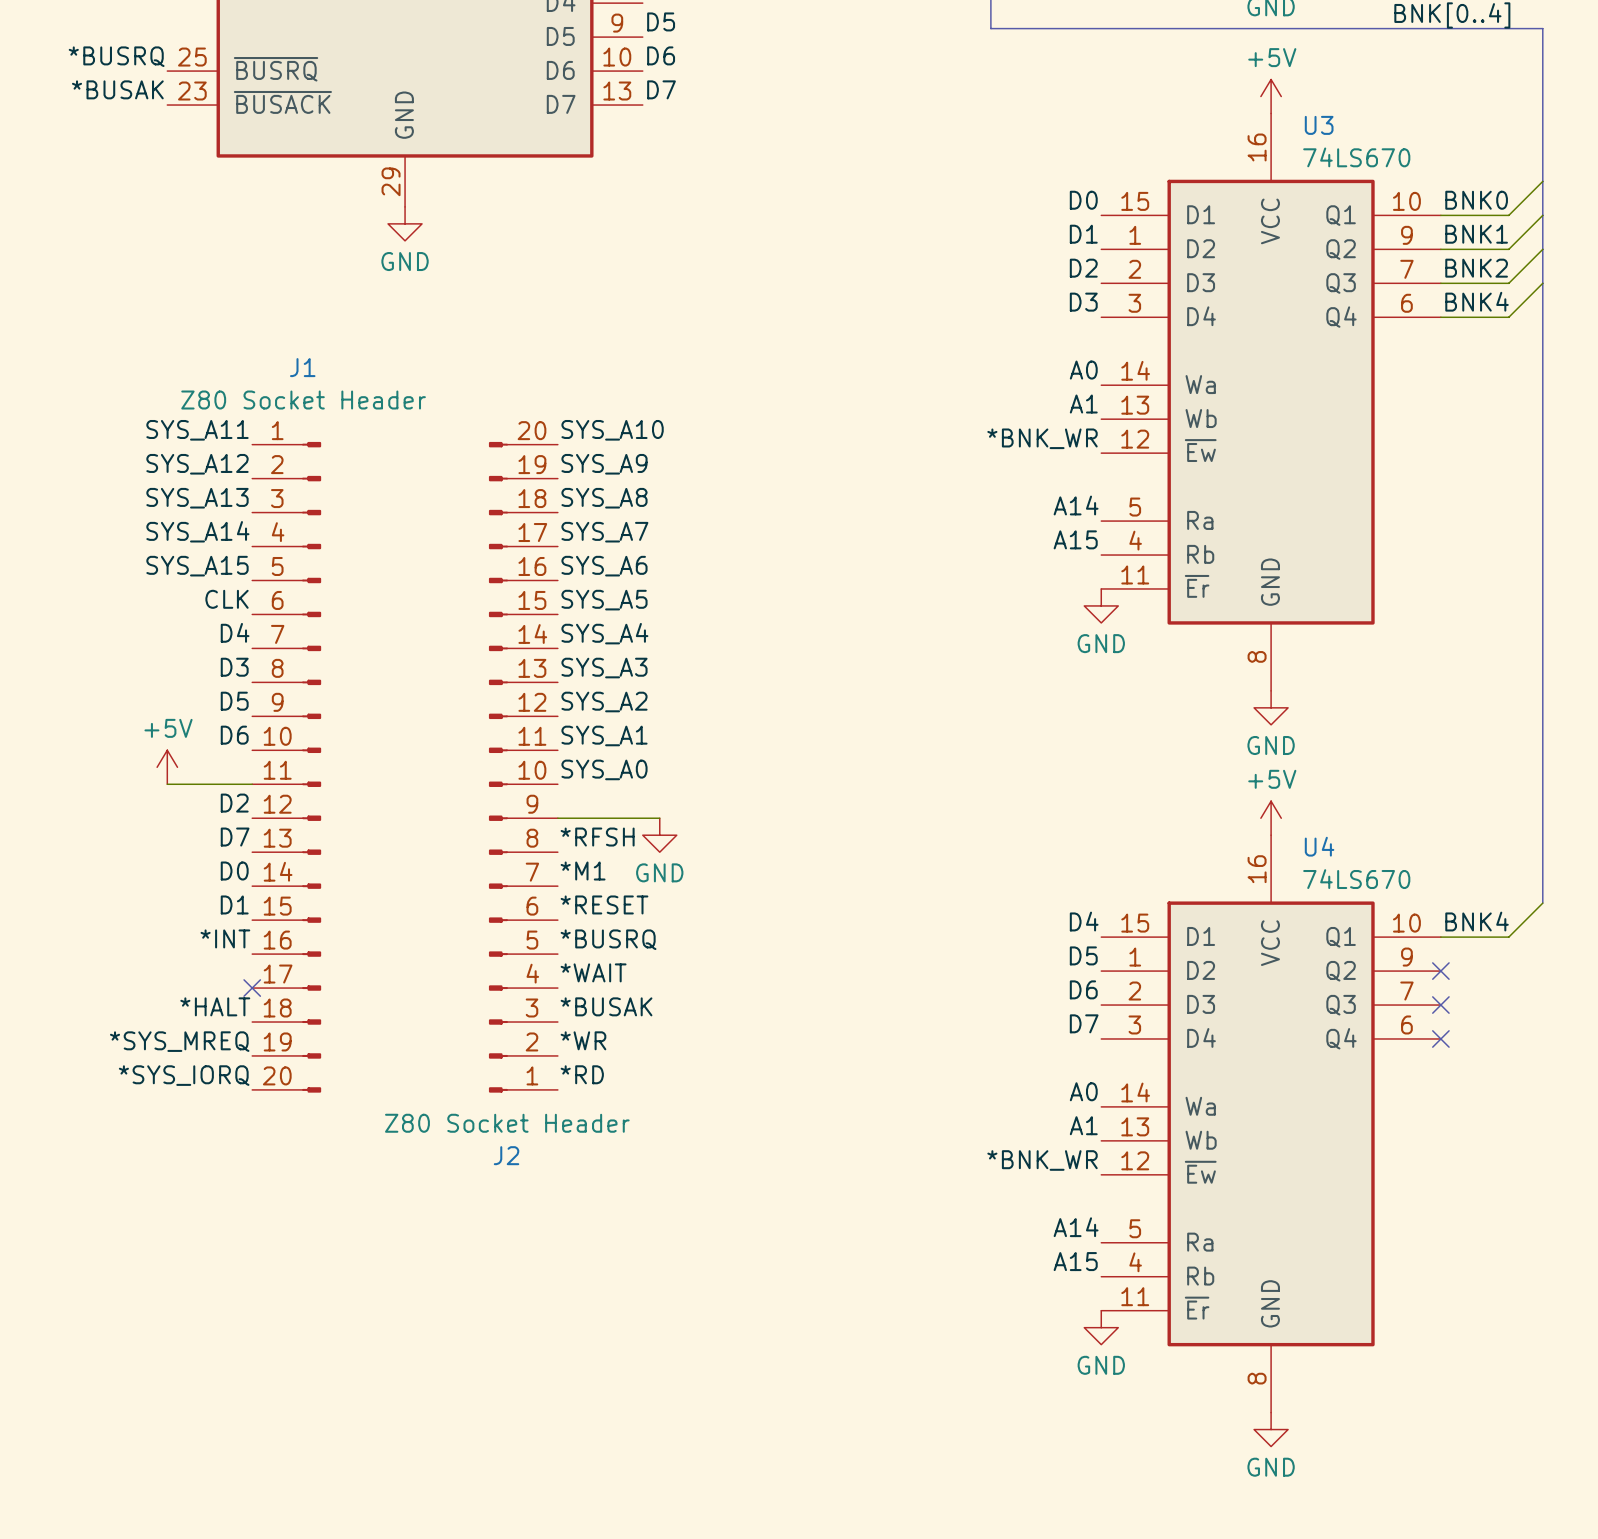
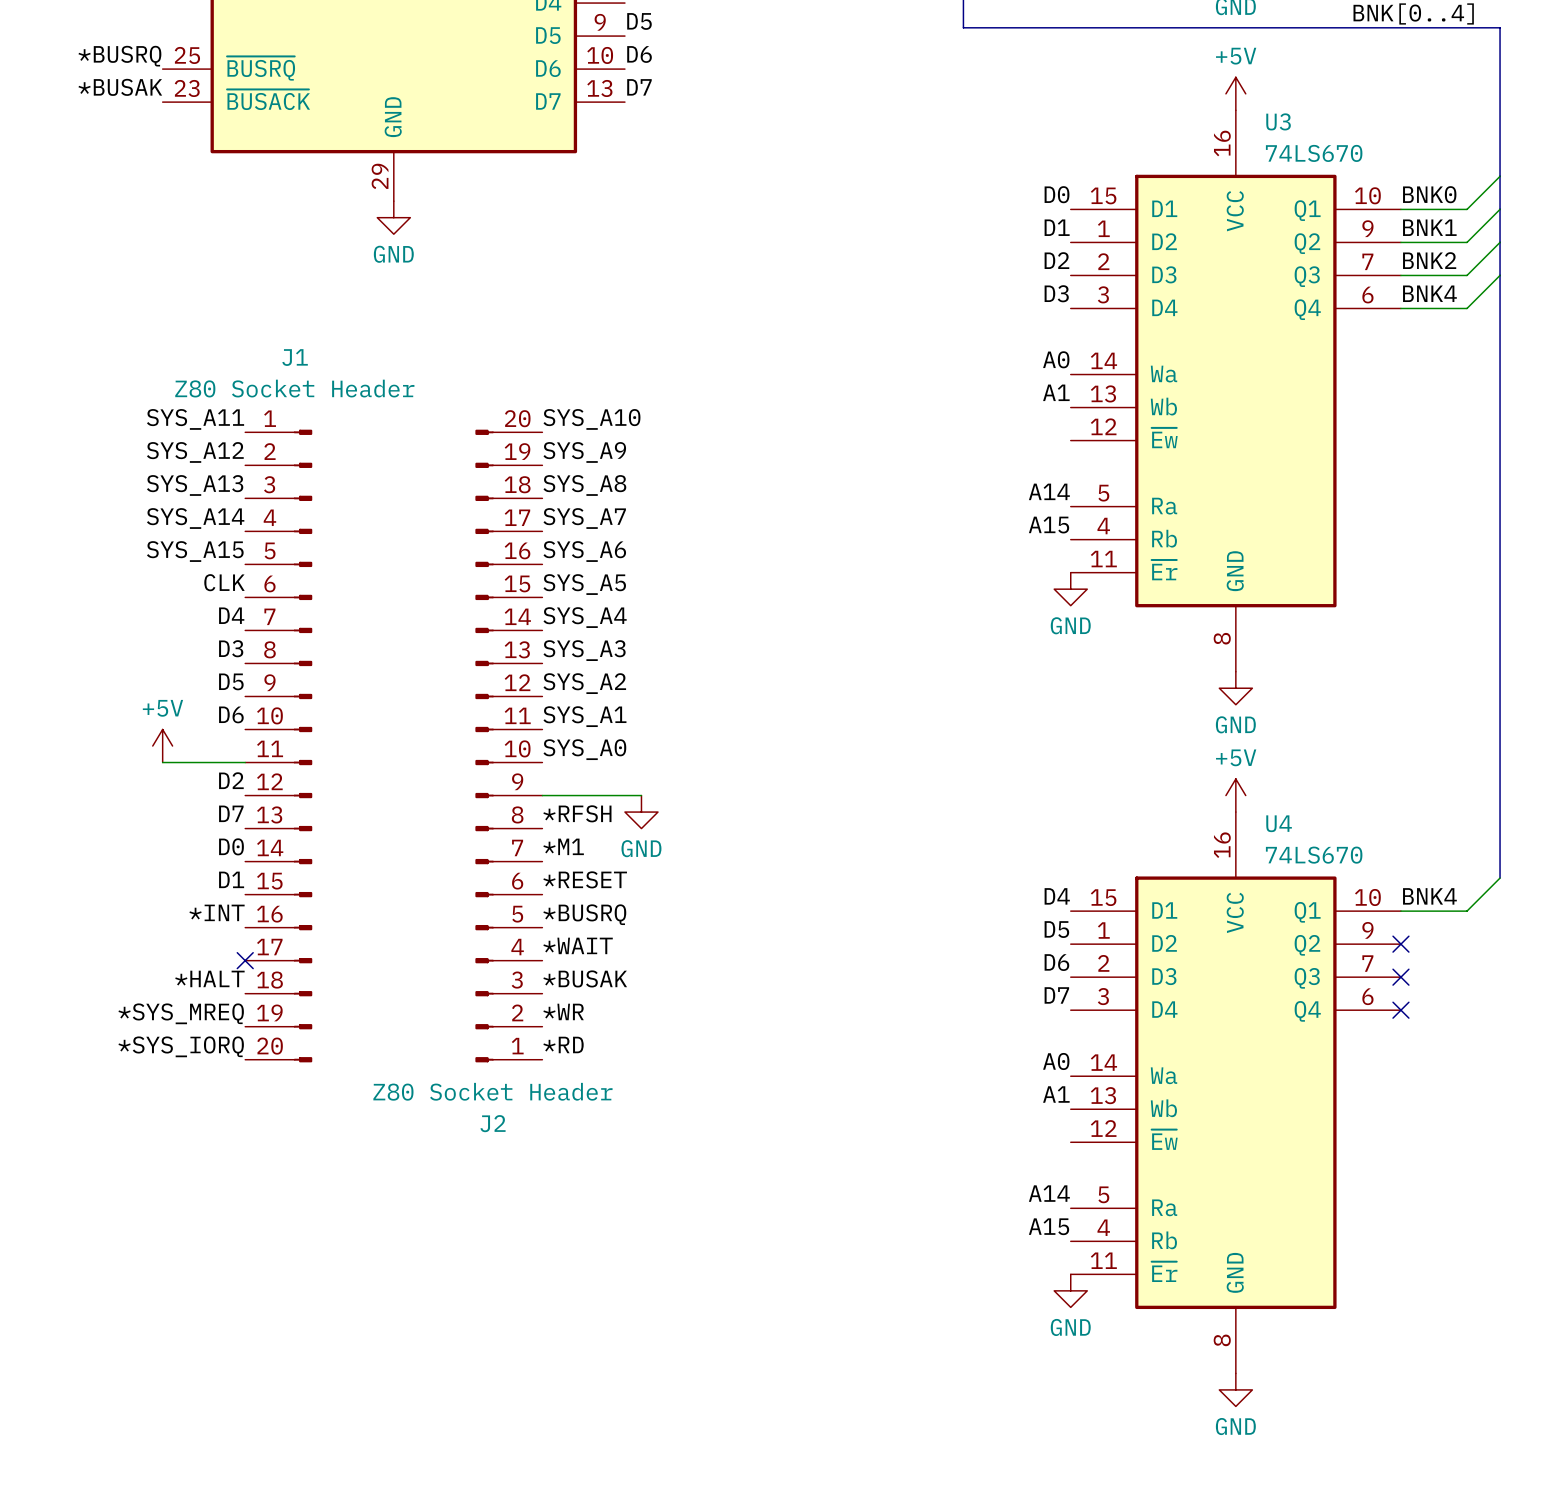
label: *BNK_WR (1042, 438) -> none
label: *BNK_WR (1042, 1160) -> none

